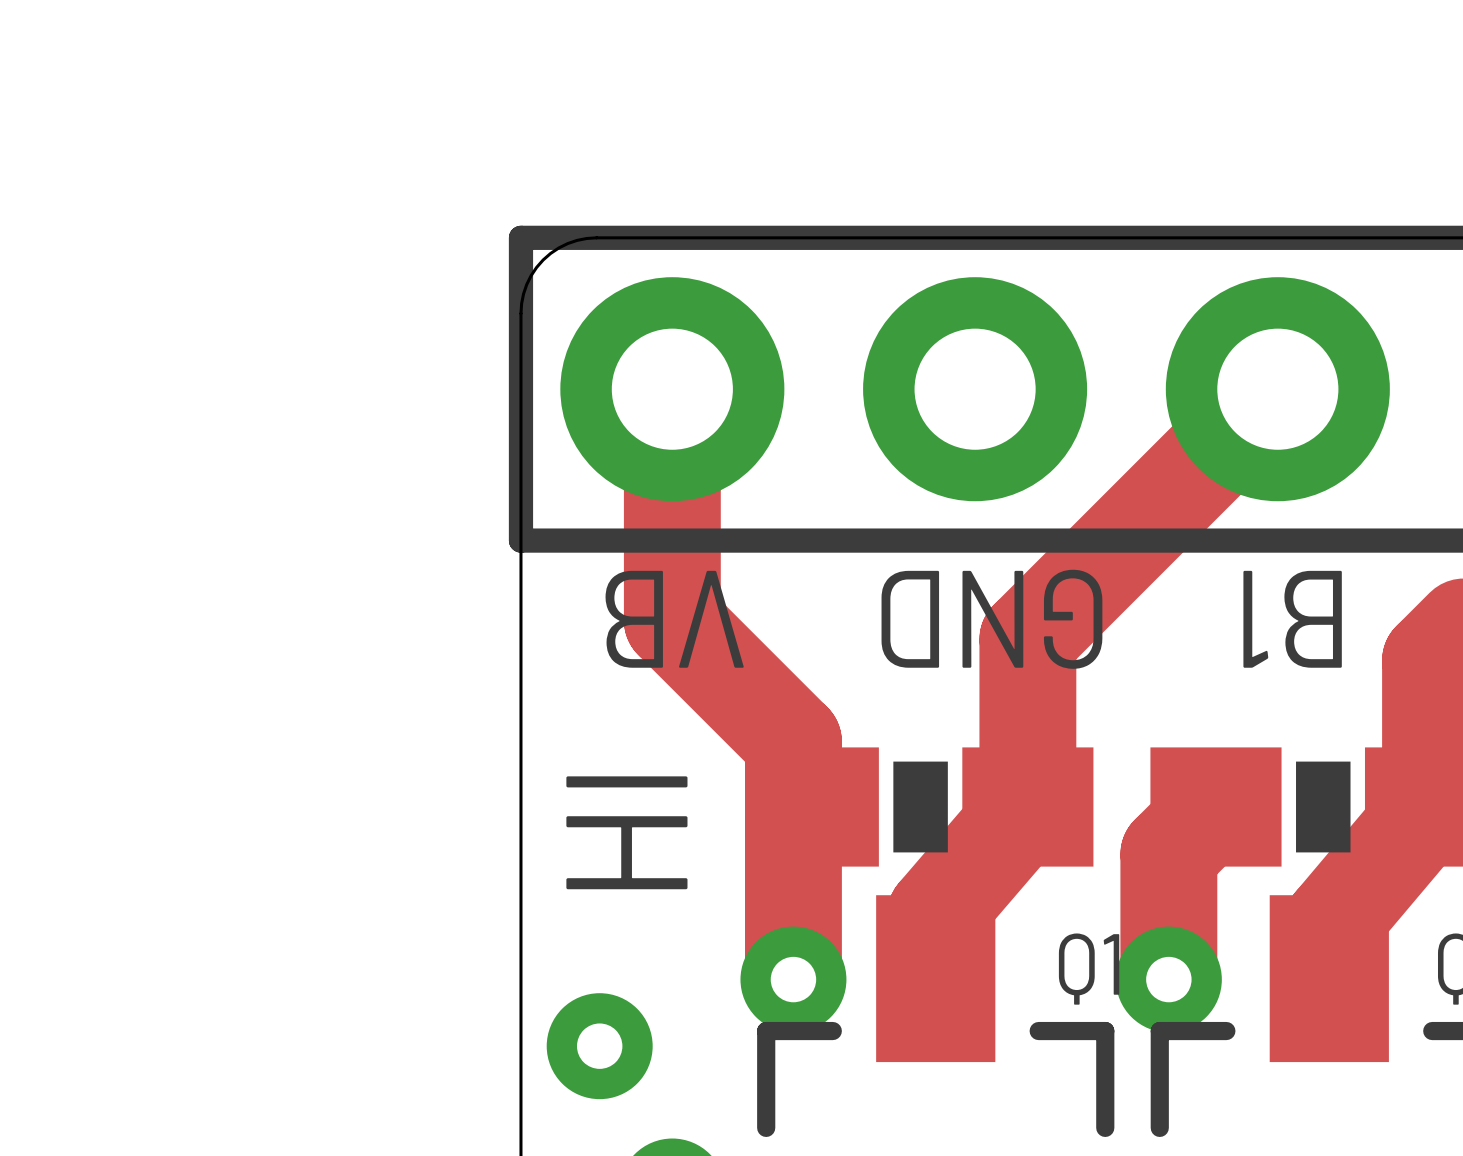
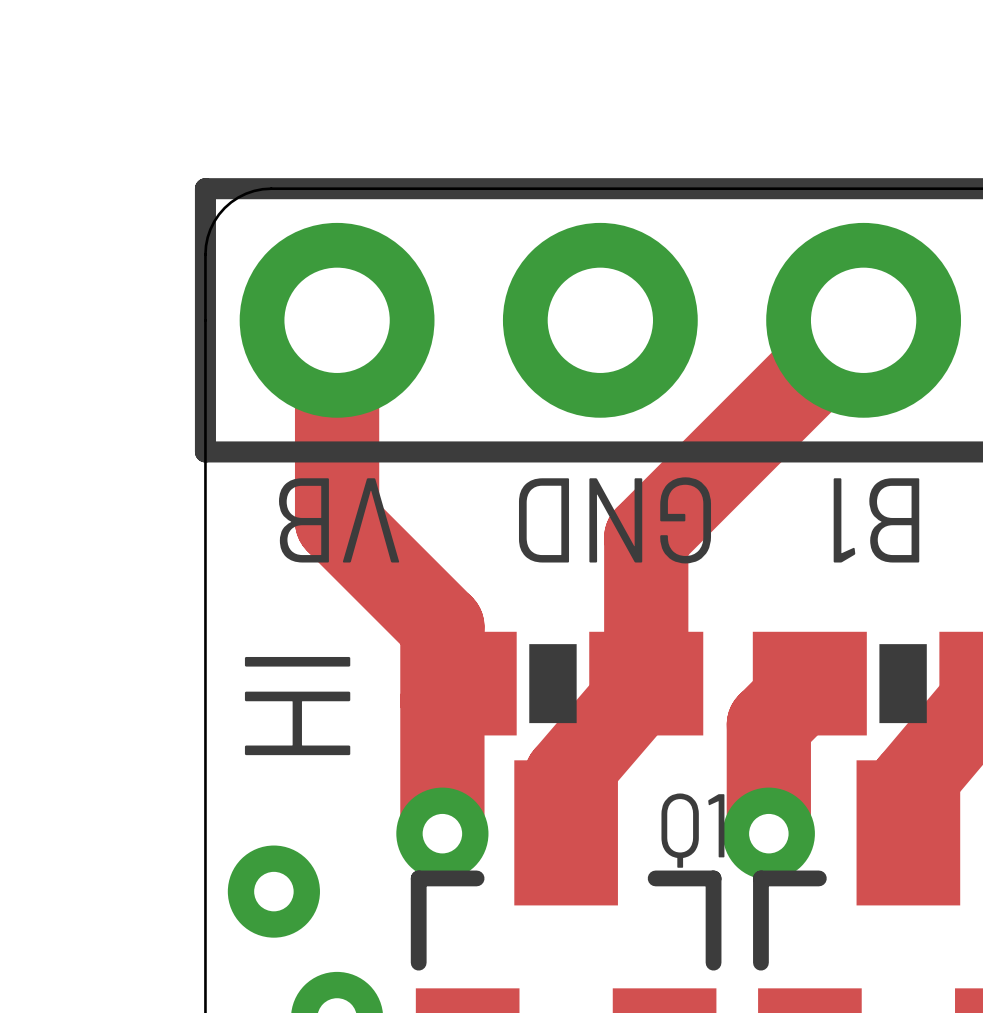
Q1 name position: Q1 (1089, 969) -> Q1 (692, 830)

